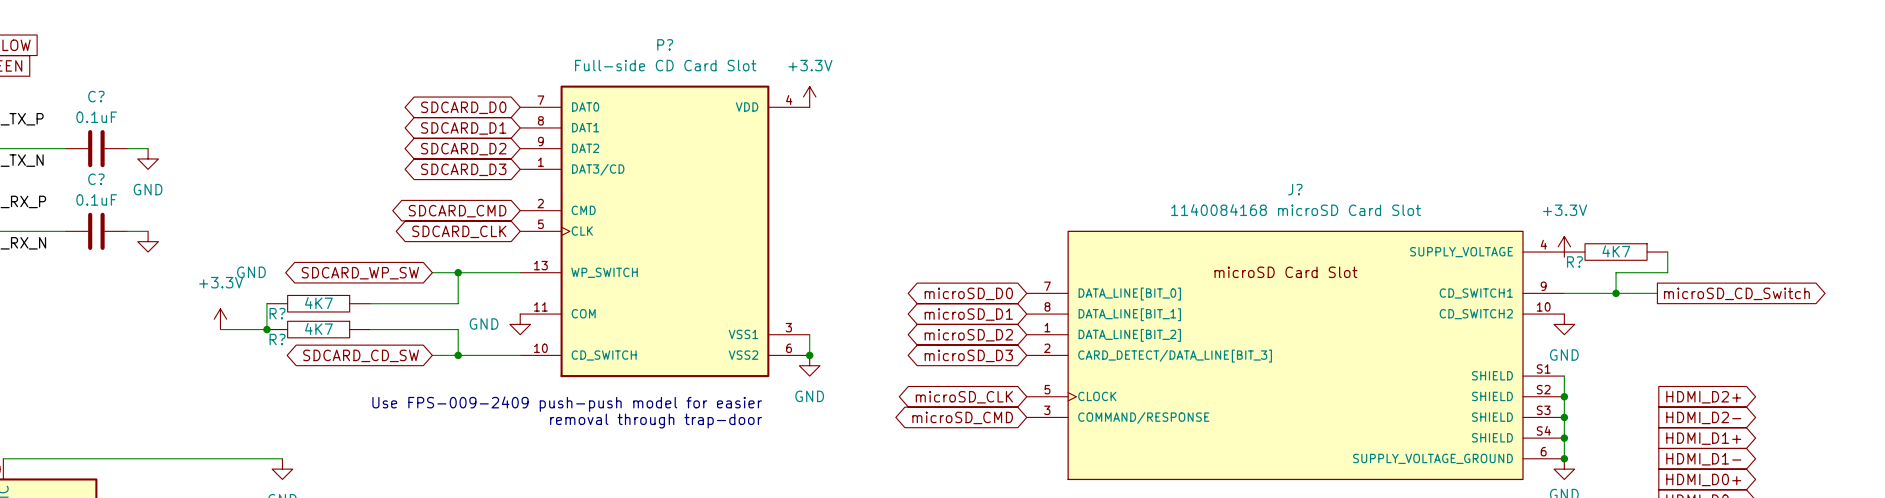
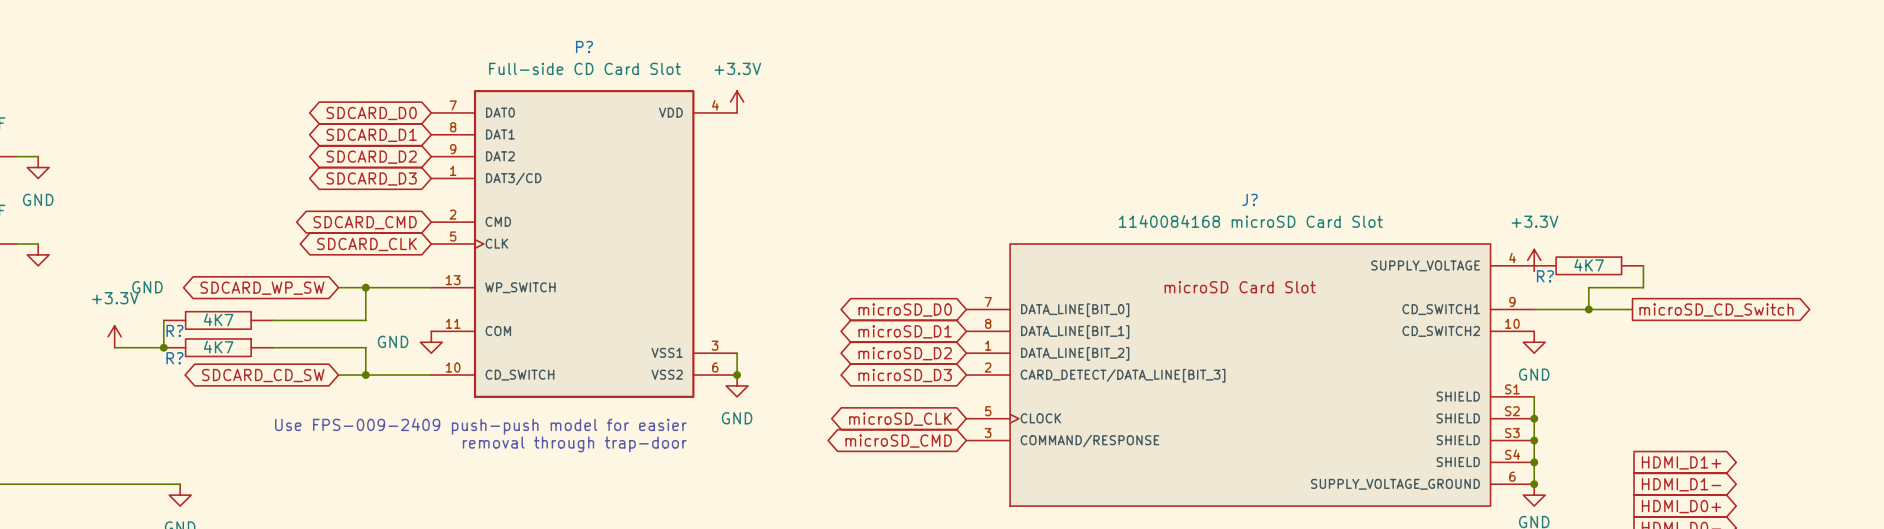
global label: HDMI_D2+ (1703, 397) -> none
global label: HDMI_D2- (1703, 417) -> none

